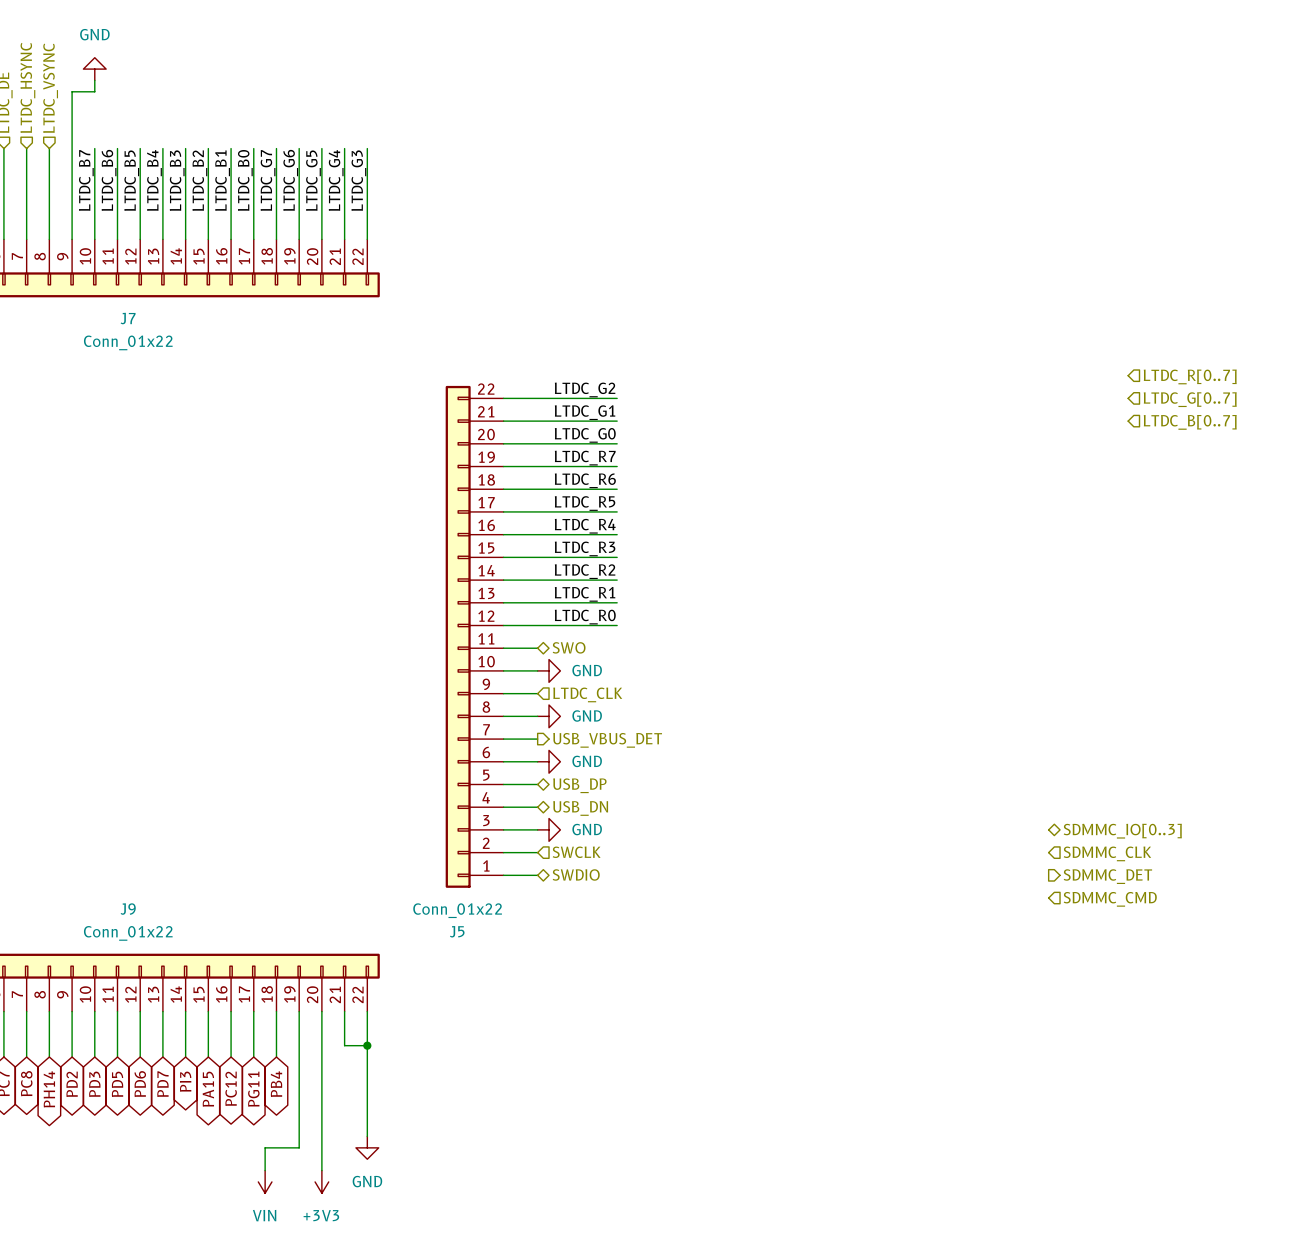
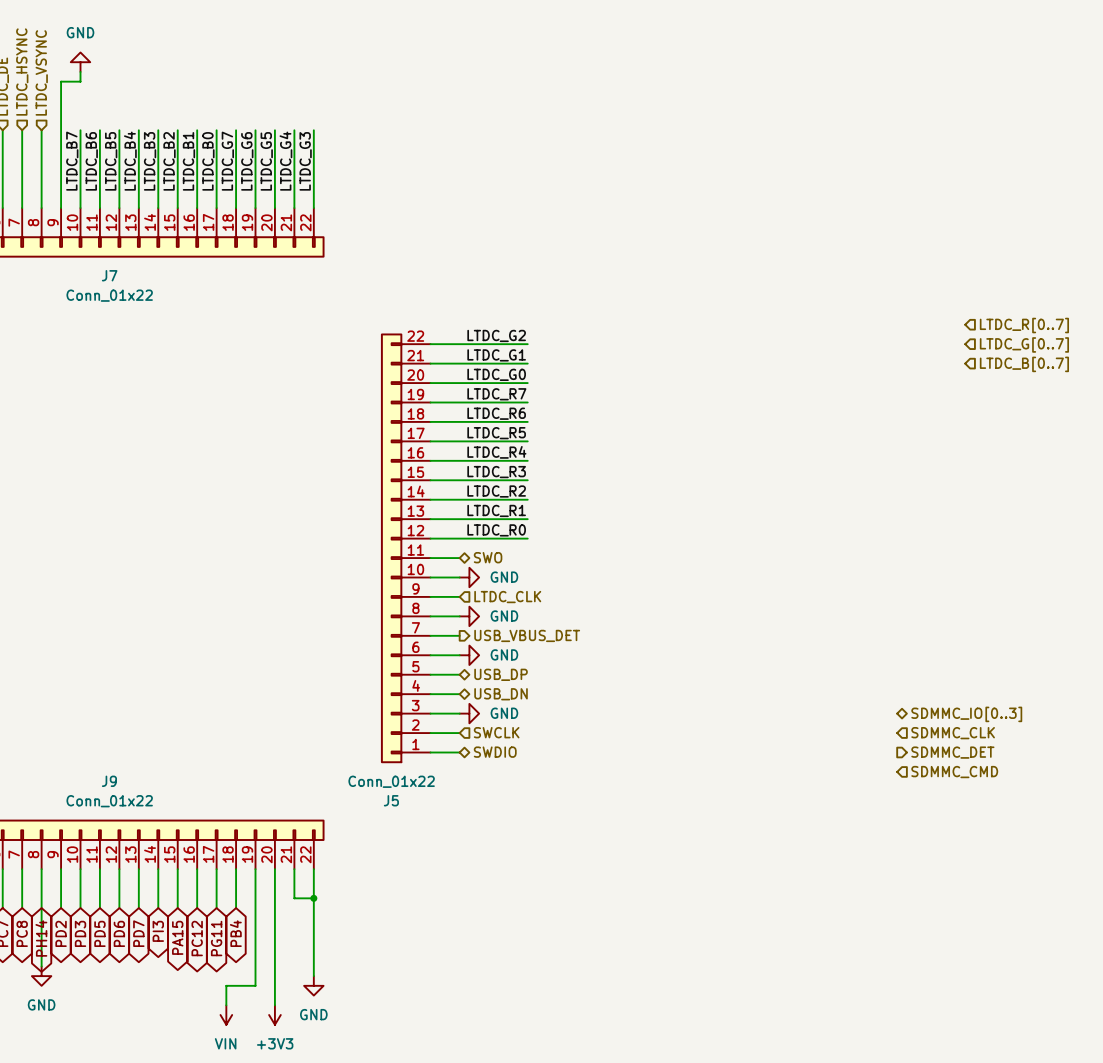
wire: none -> (41, 908) (41, 966)
power symbol: none -> GND (41, 976)

